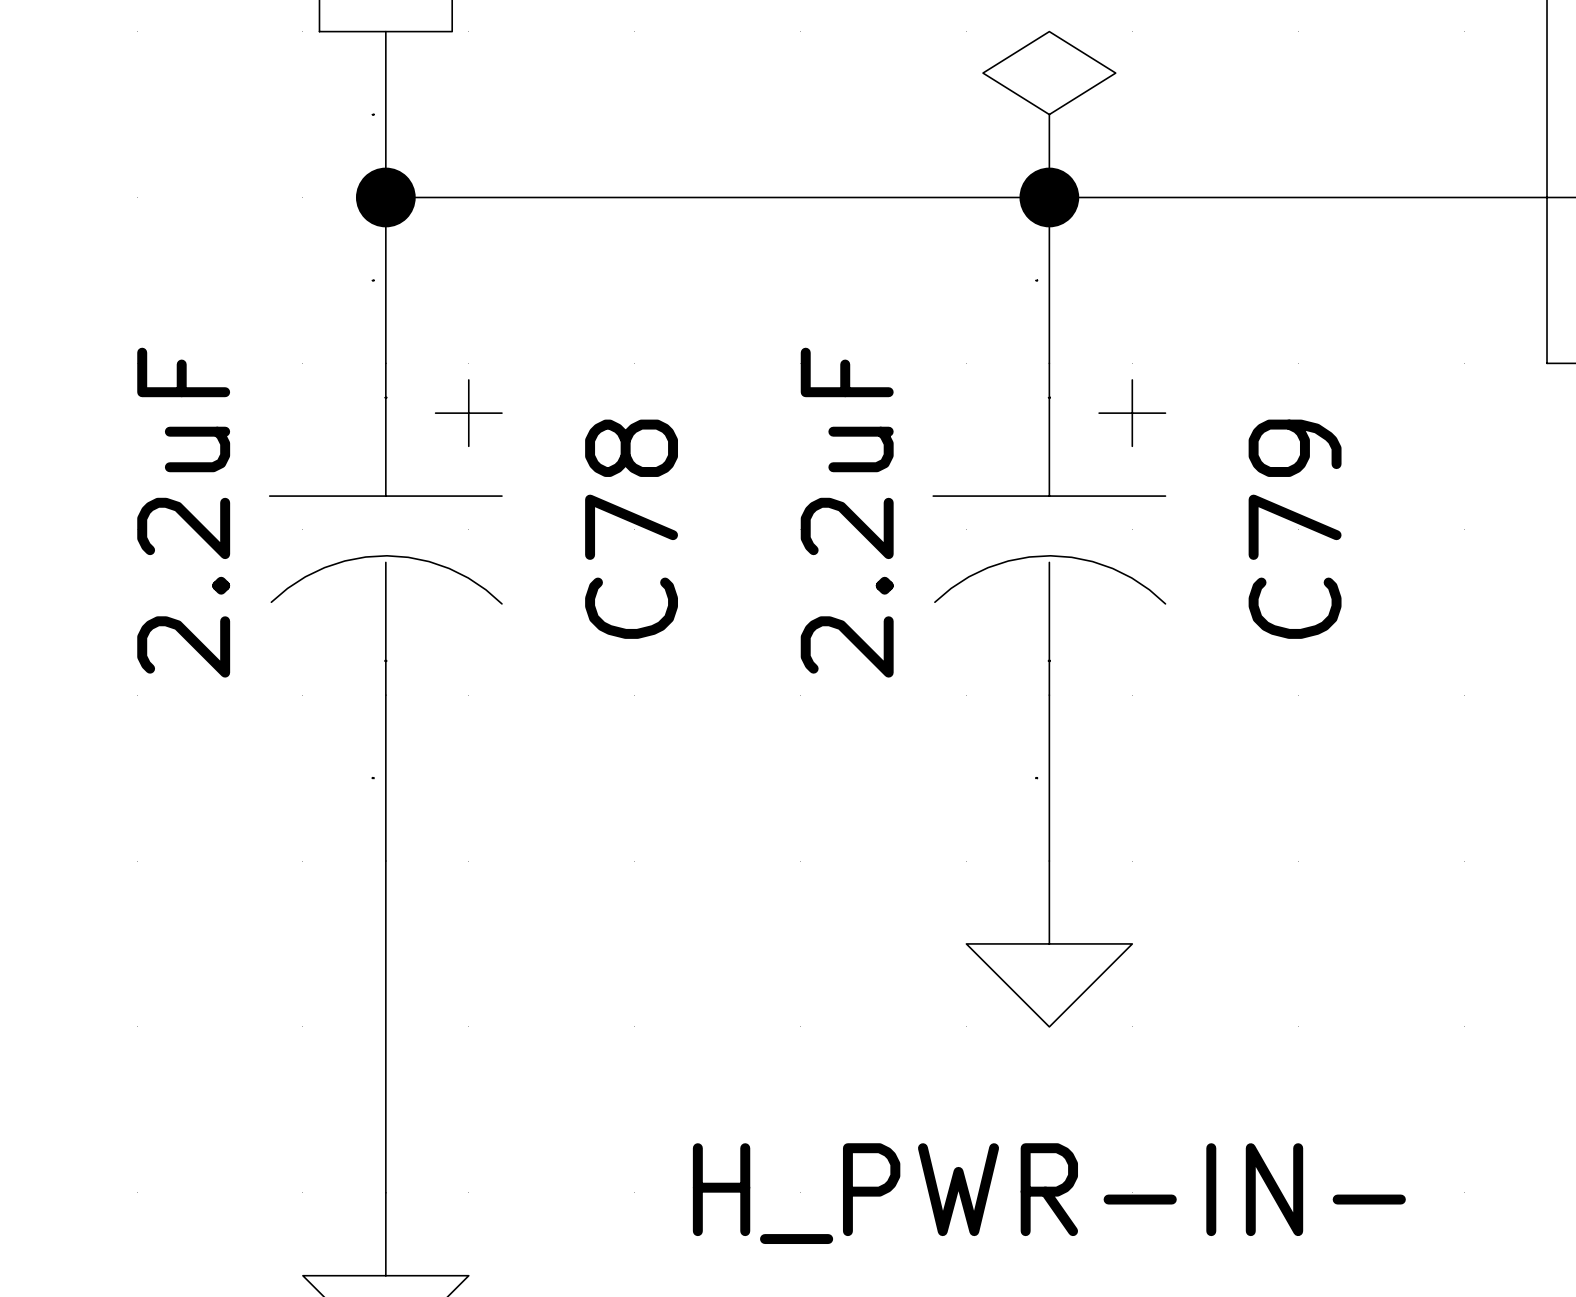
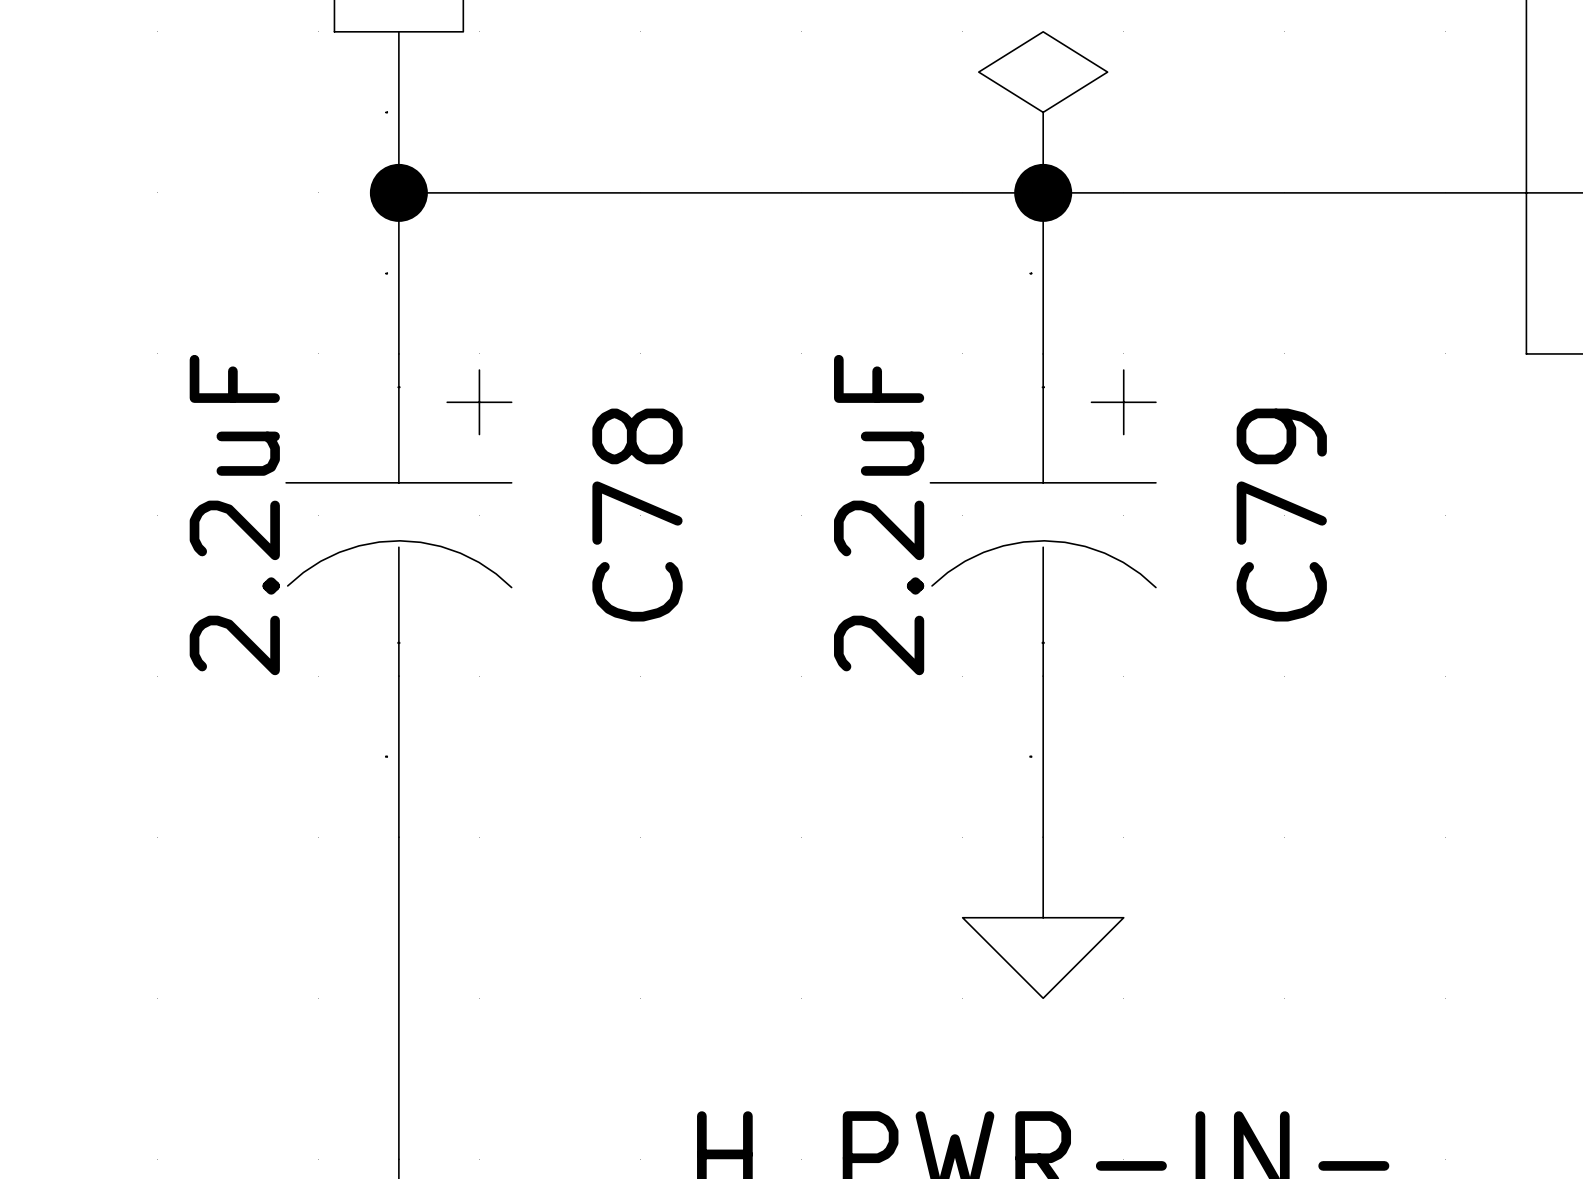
C78 value position: 2.2uF (183, 512) -> 2.2uF (234, 515)
C79 value position: 2.2uF (847, 512) -> 2.2uF (879, 515)

